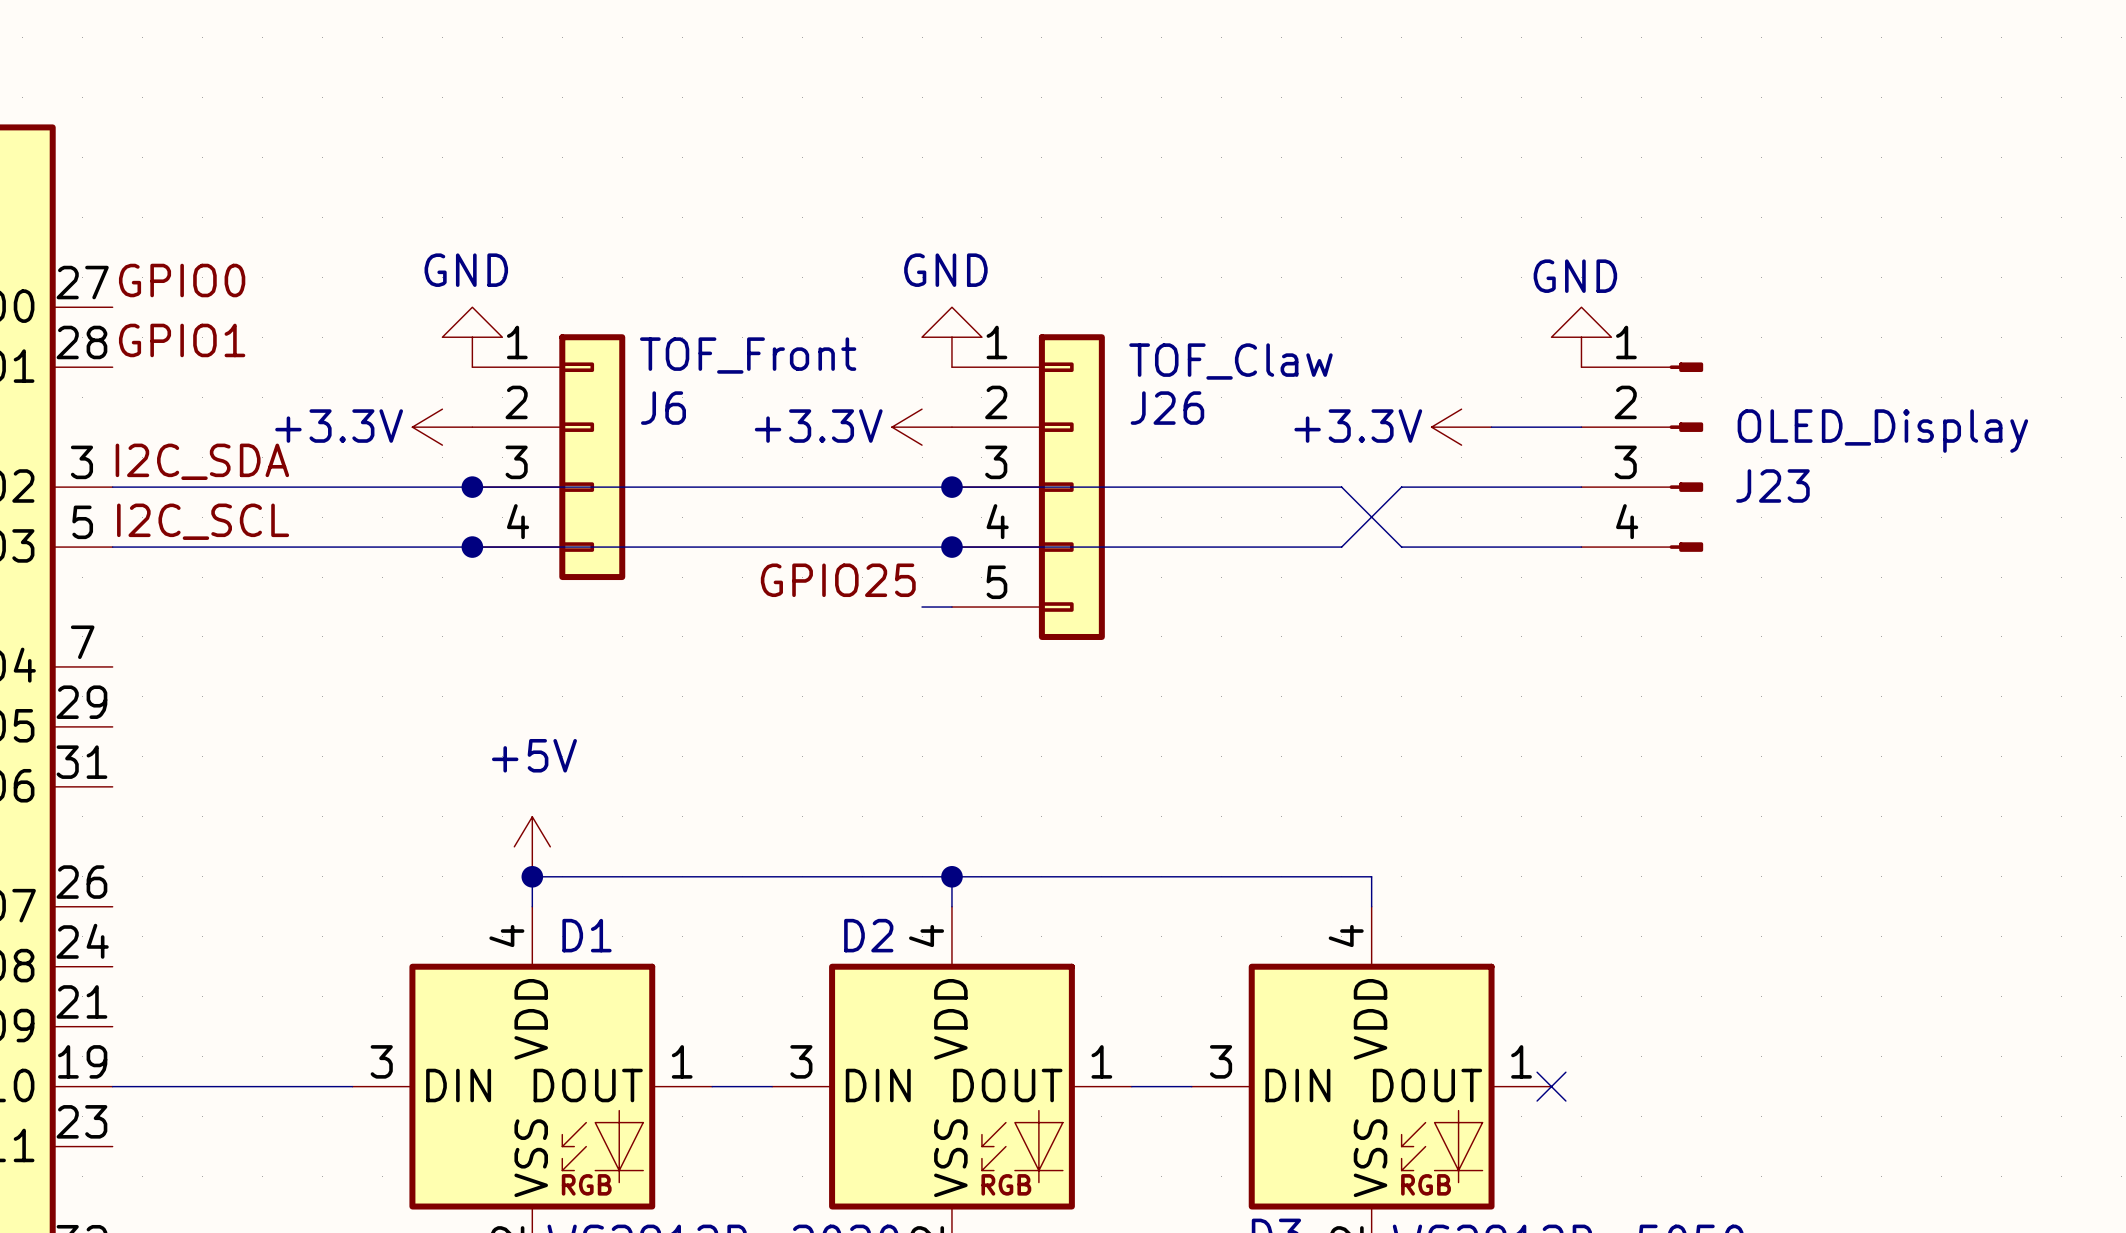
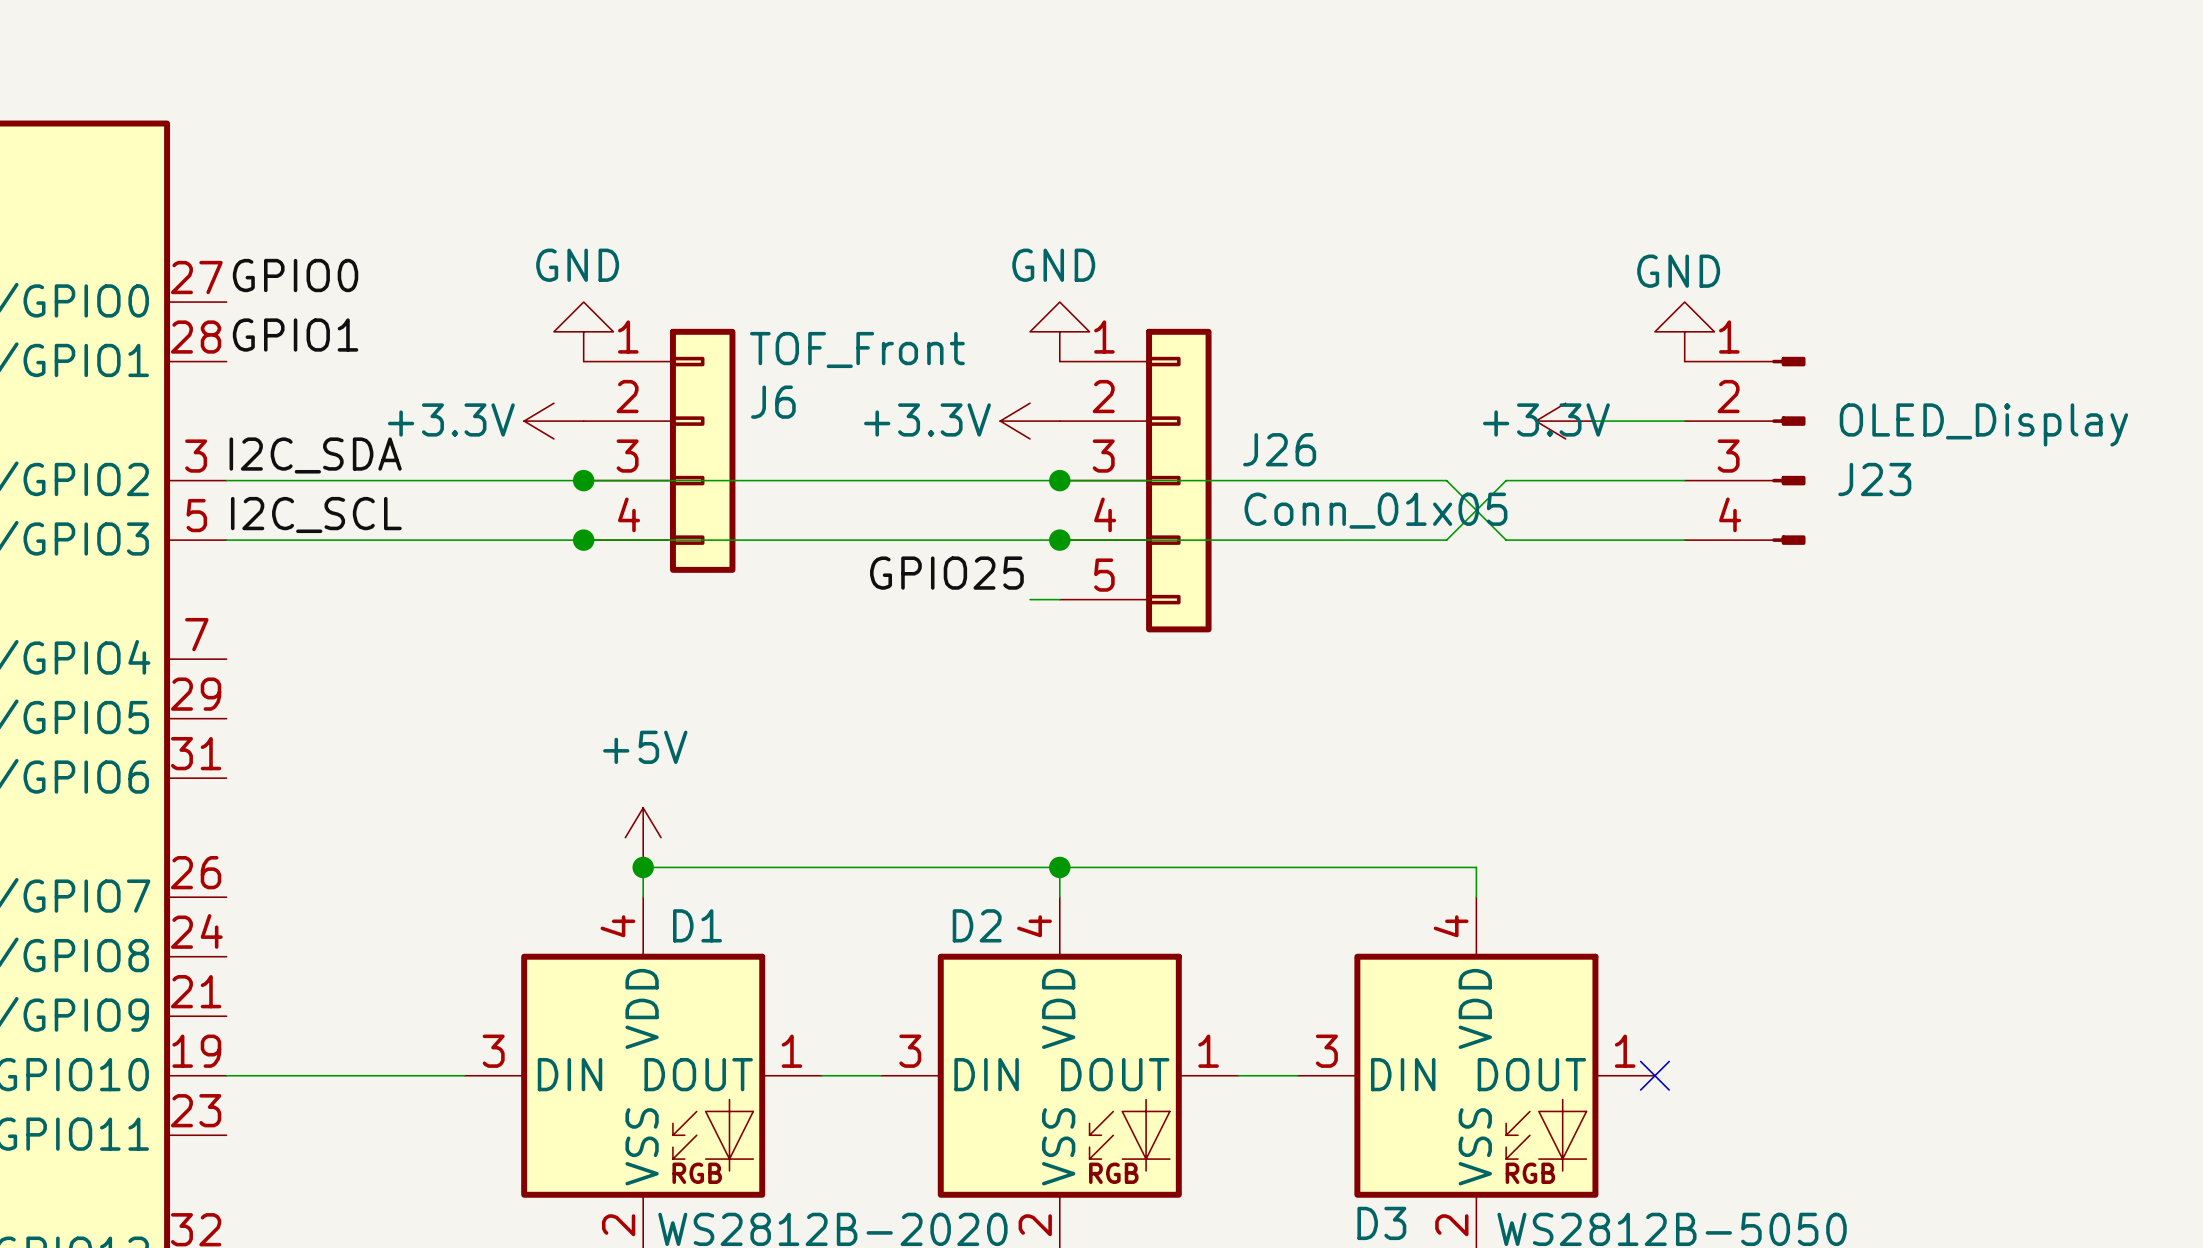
J26 value: TOF_Claw (1230, 361) -> Conn_01x05 (1376, 510)
J26 name position: J26 (1167, 408) -> J26 (1279, 449)
power symbol text position: +3.3V (1358, 426) -> +3.3V (1546, 419)

